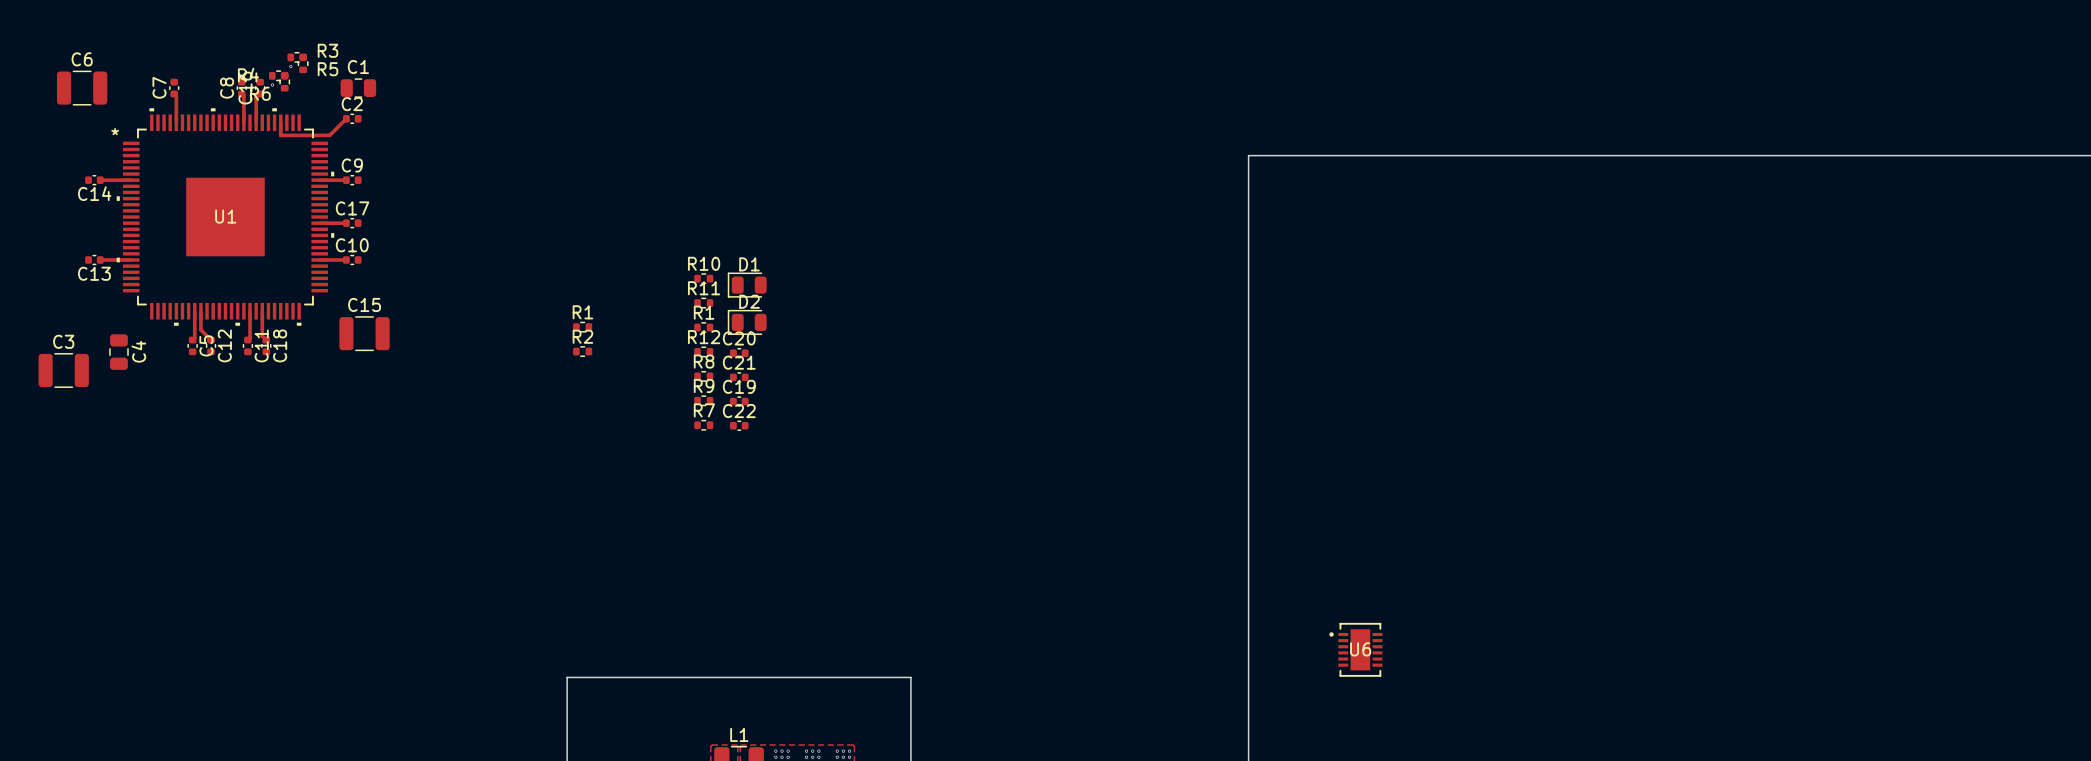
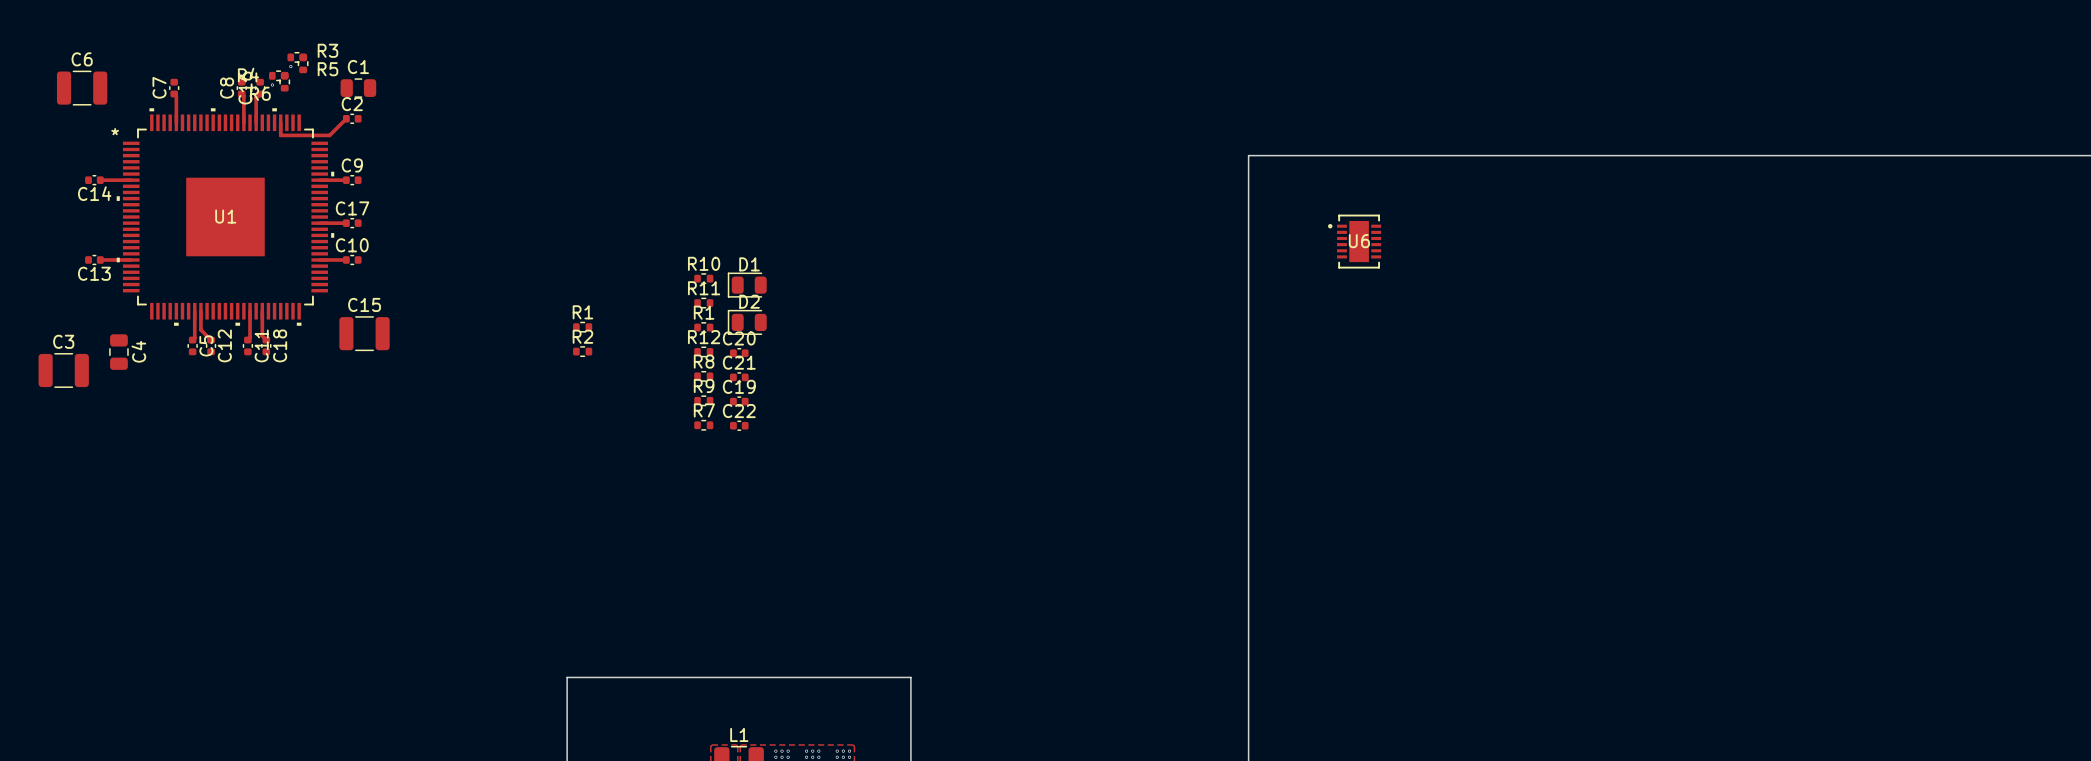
U6 position: (1355, 649) -> (1354, 241)

